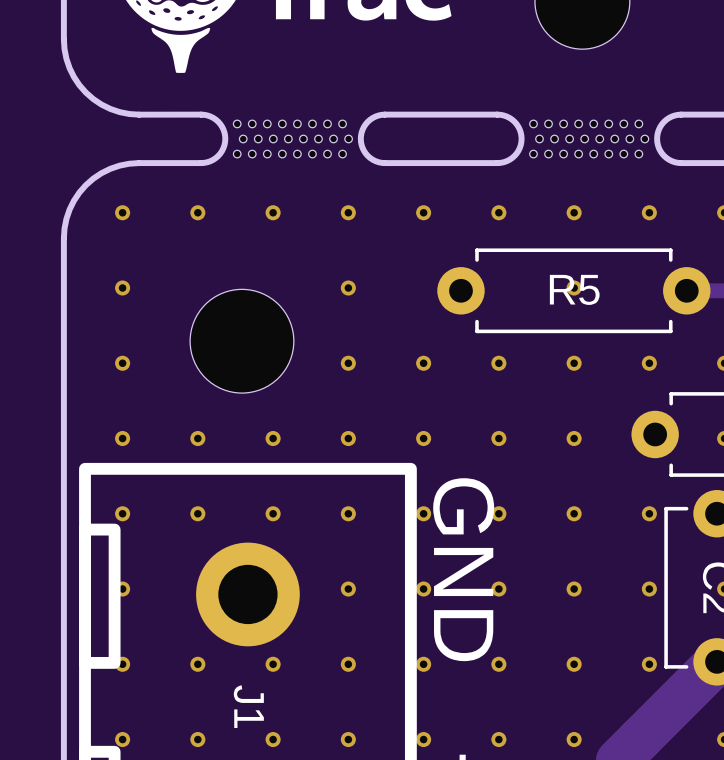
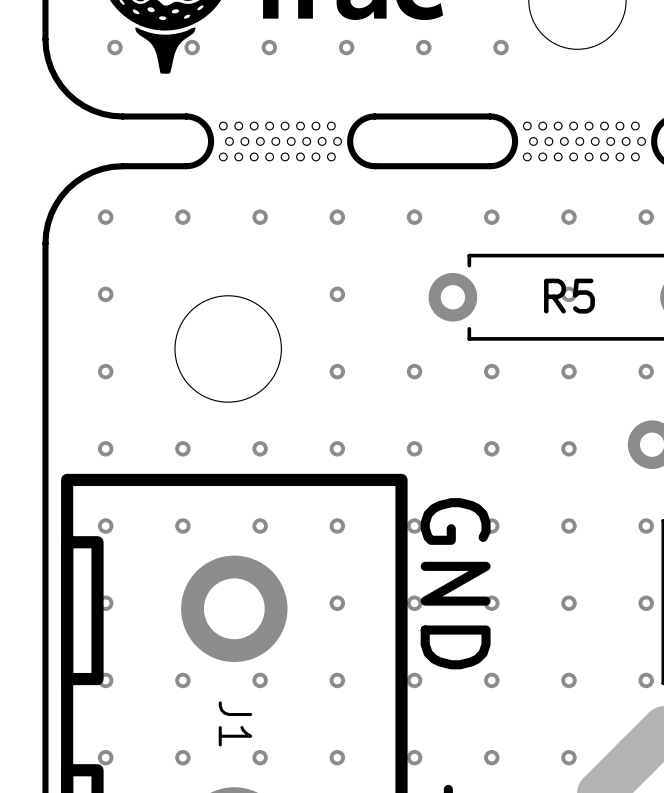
via: none -> (114, 47)
via: none -> (192, 47)
via: none -> (269, 47)
via: none -> (346, 47)
via: none -> (423, 47)
via: none -> (501, 47)

